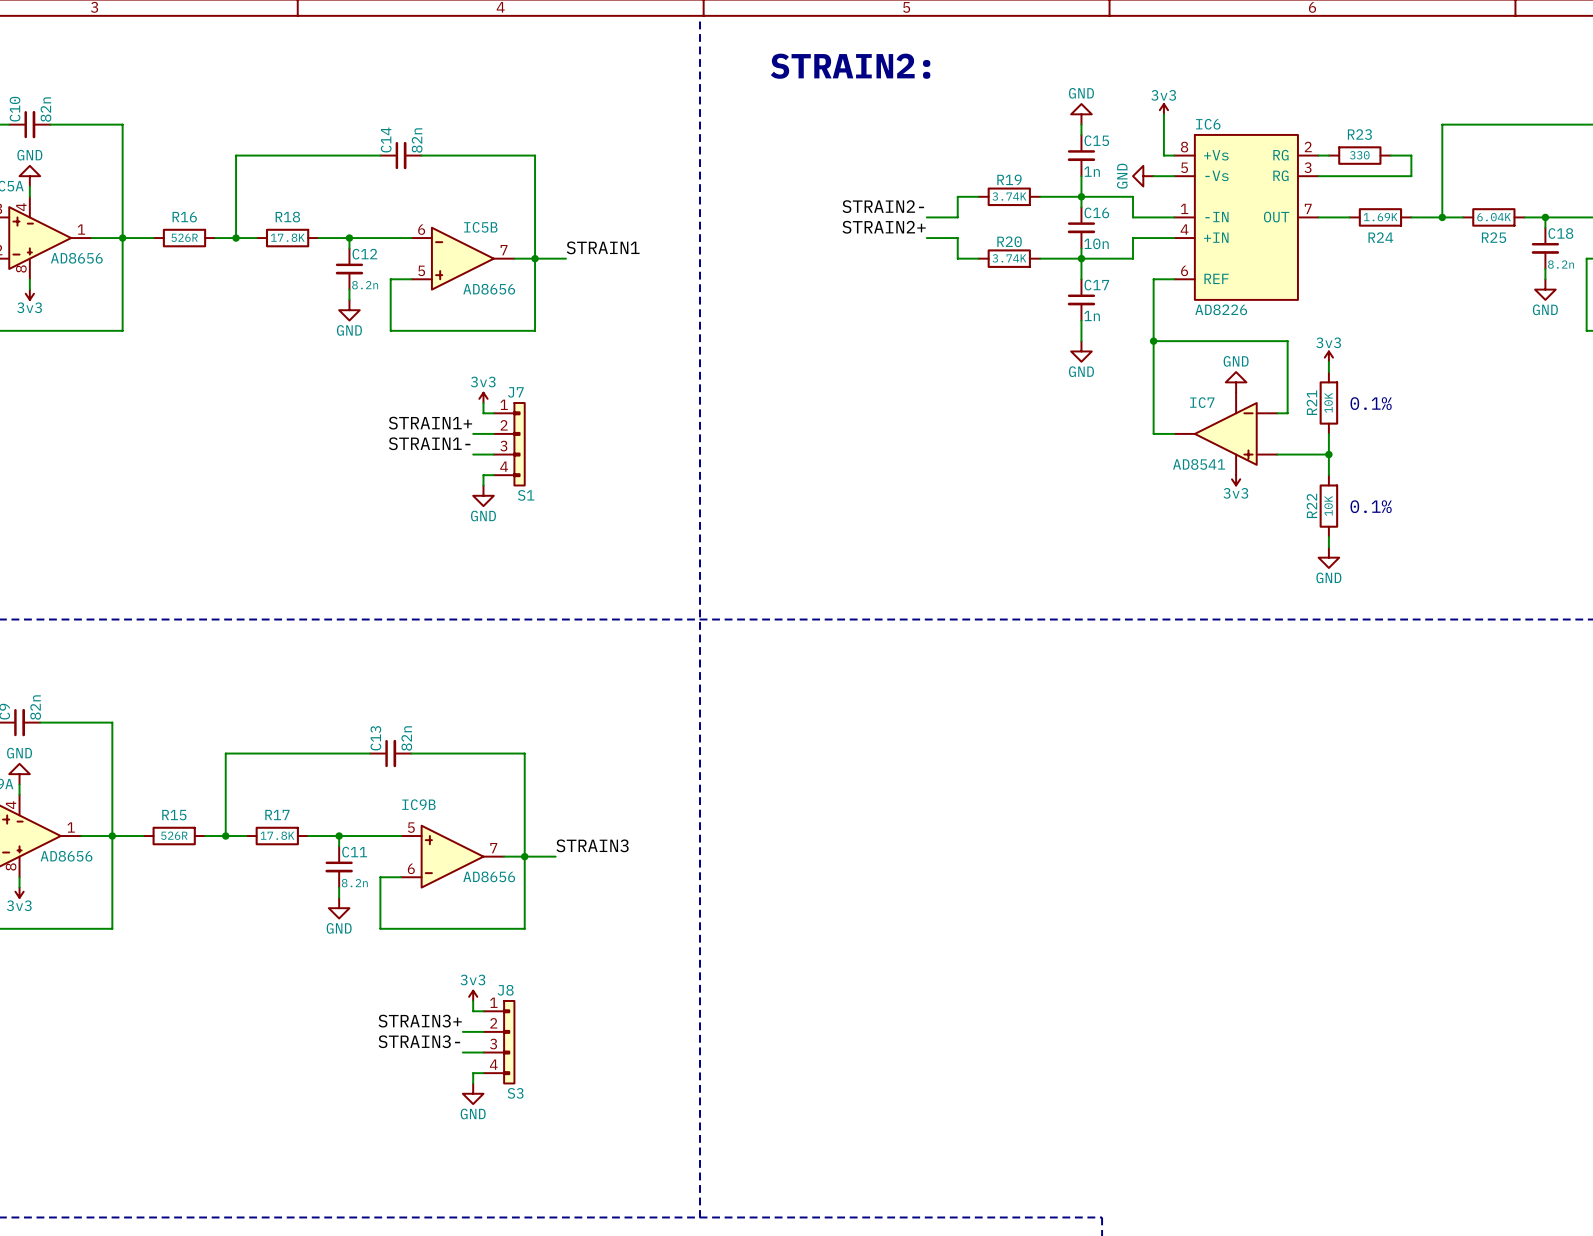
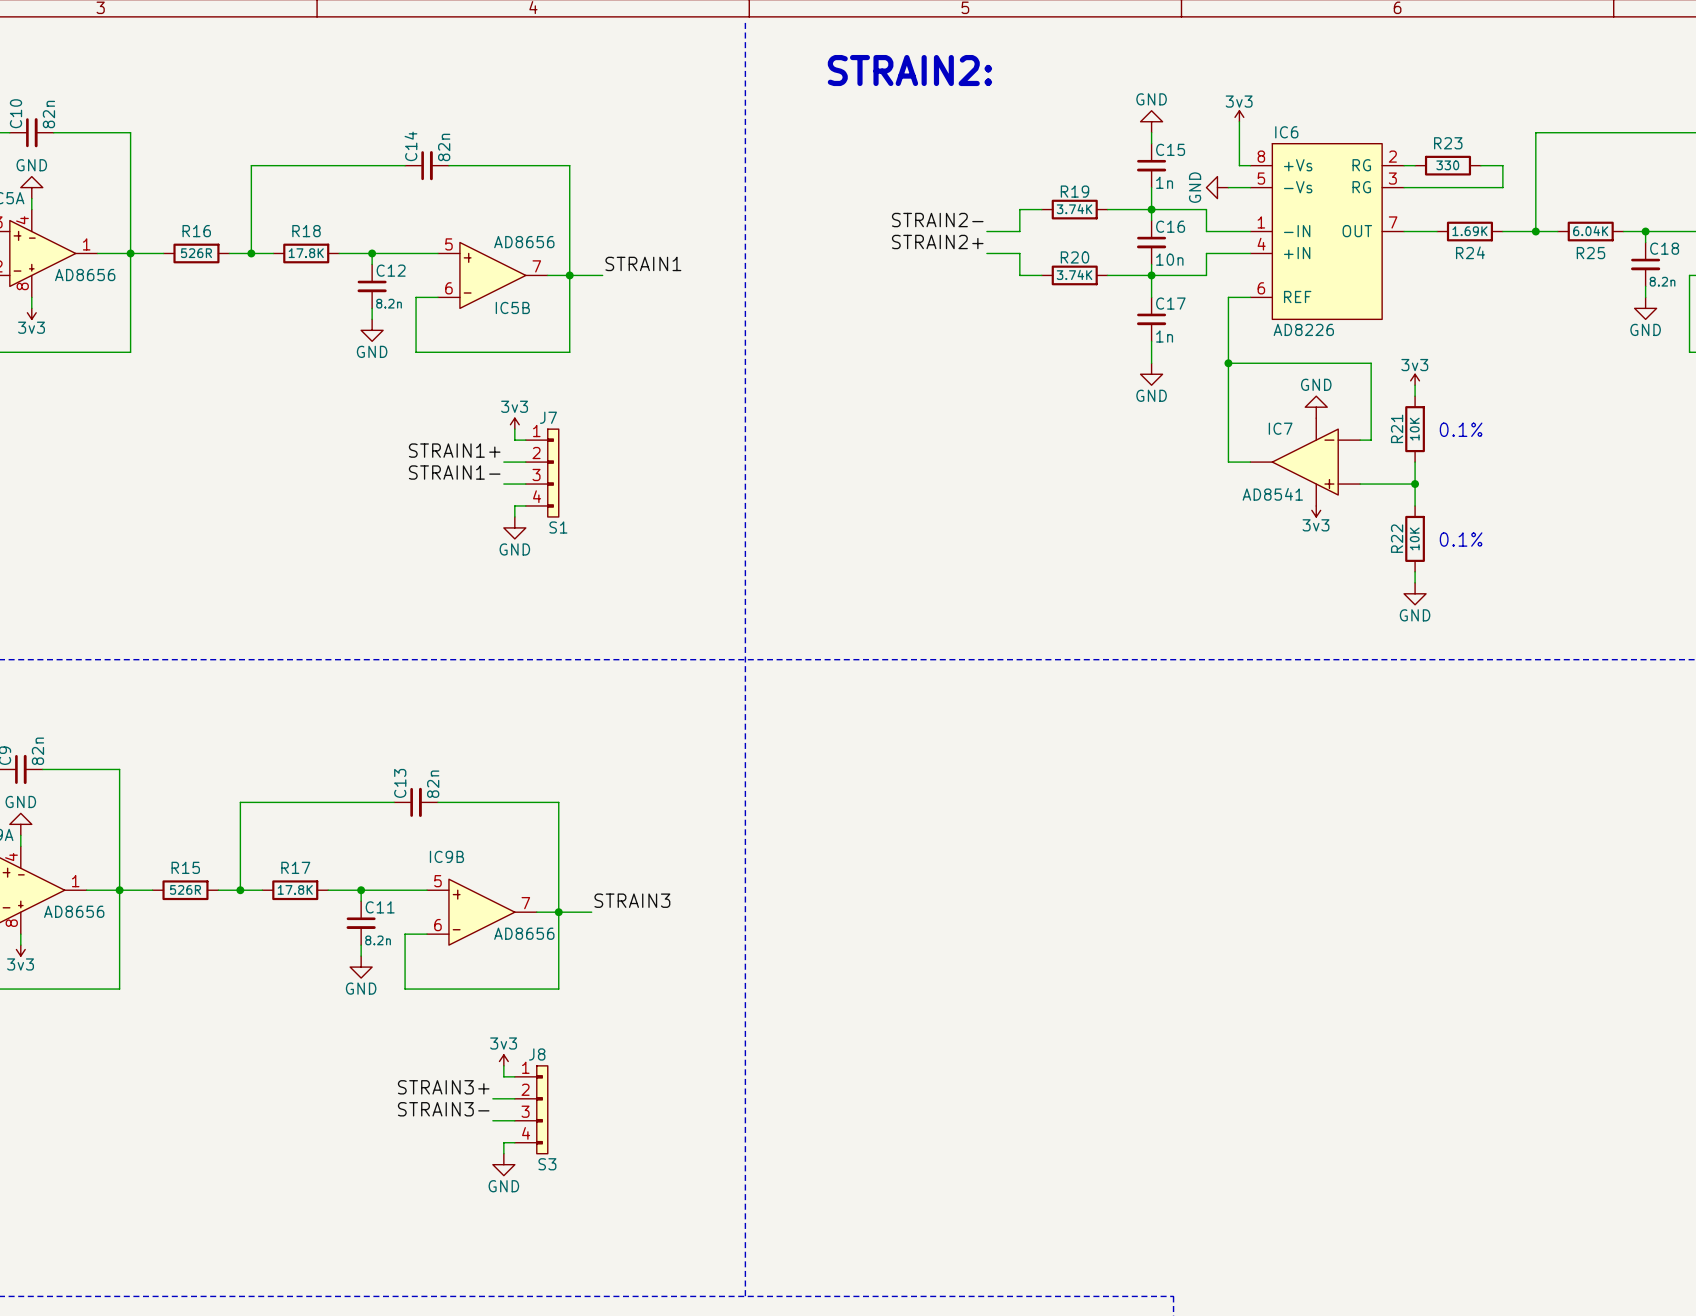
IC5B flip: as is (462, 258) -> up-down (492, 275)

